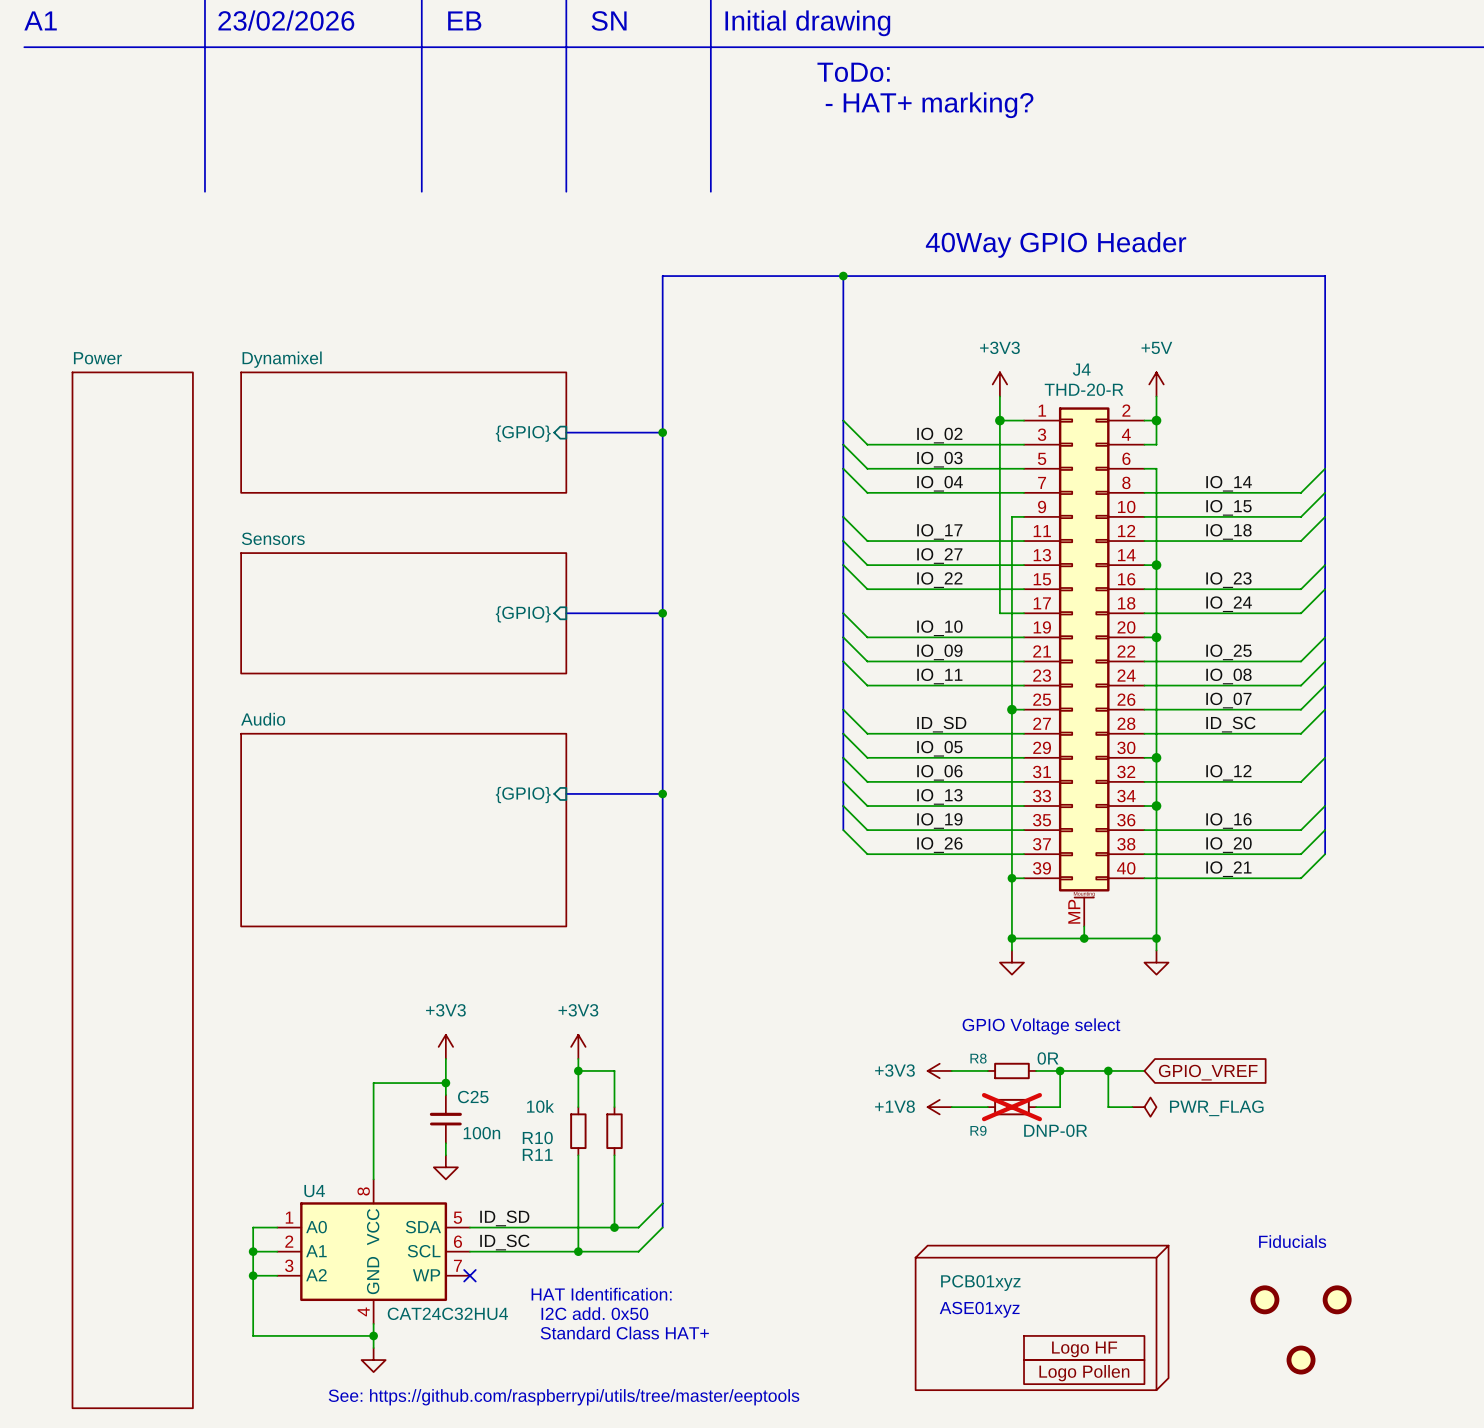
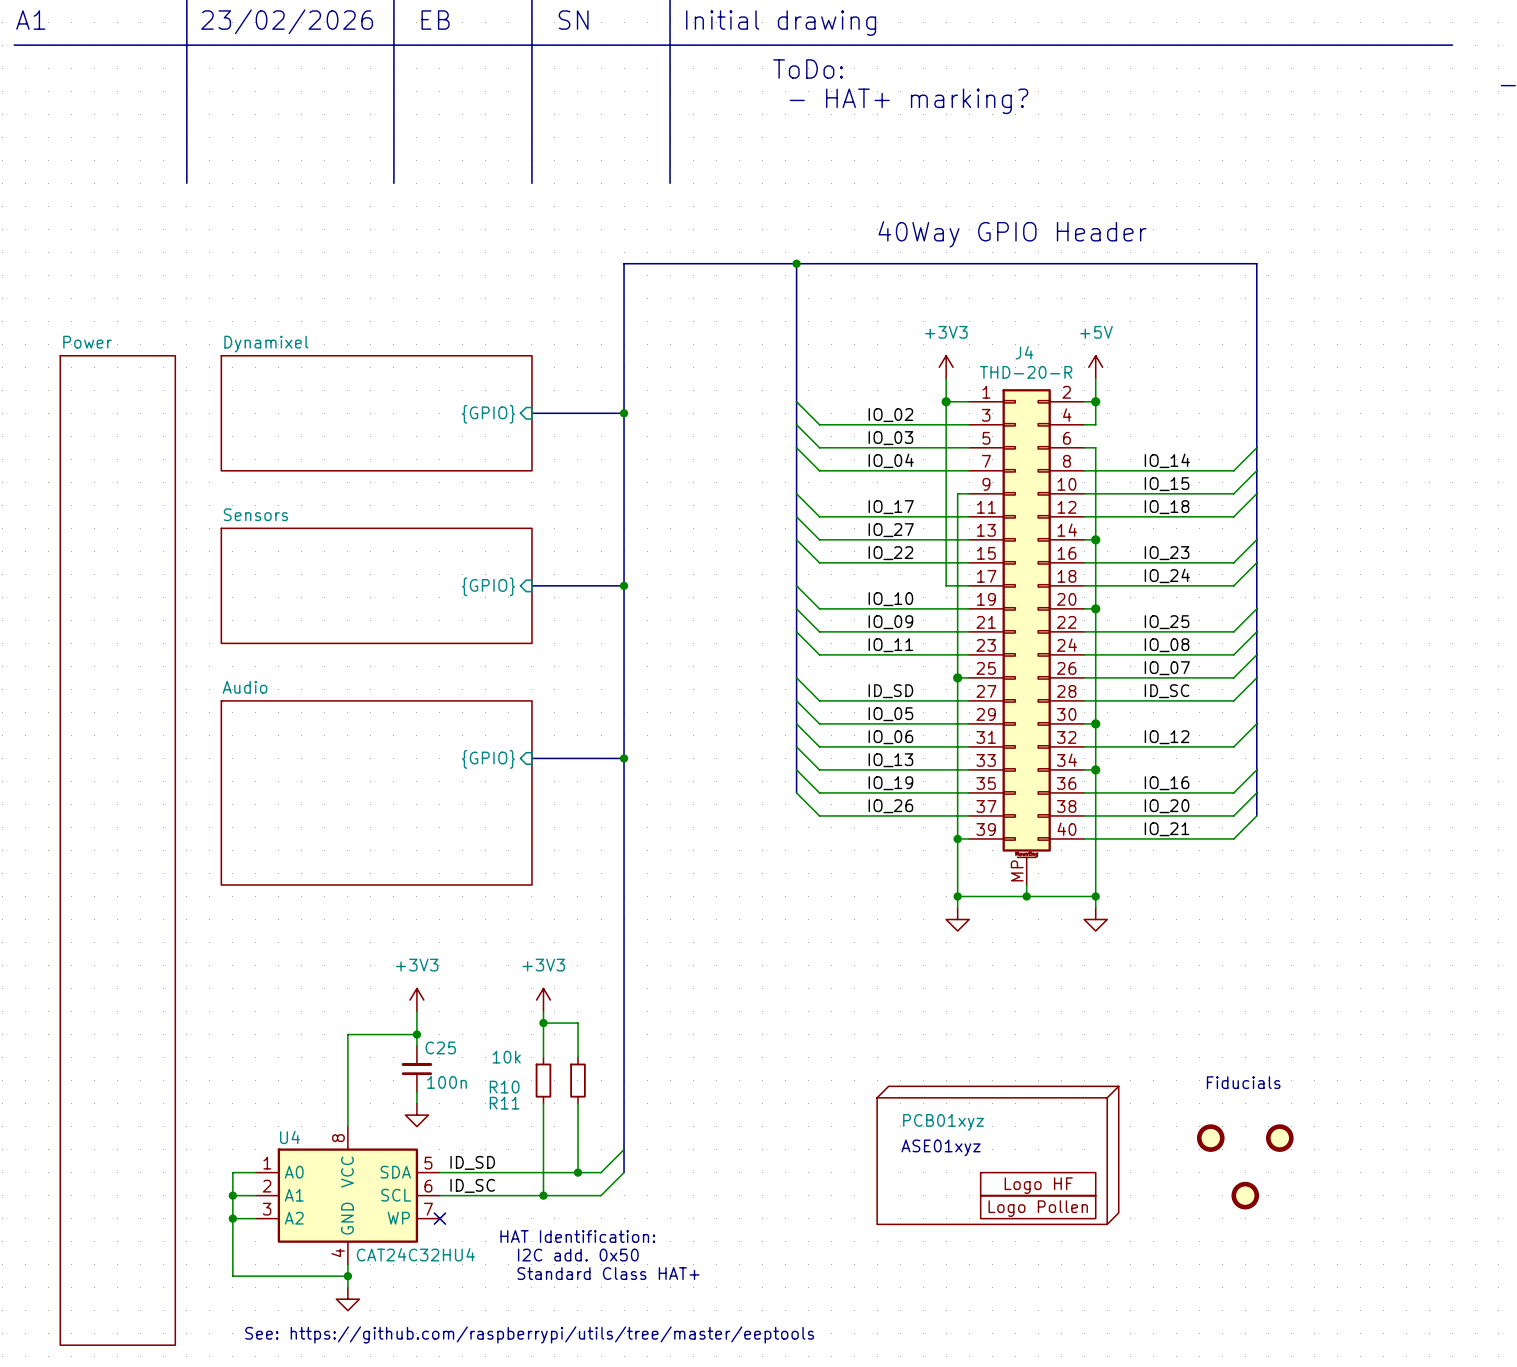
text: GPIO Voltage select (1041, 1026) -> none
power symbol: +3V3 (939, 1070) -> none
wire: (951, 1070) (987, 1070) -> none
R8: 0R (1011, 1070) -> none
wire: (1036, 1070) (1144, 1070) -> none
wire: (1060, 1070) (1060, 1107) (1036, 1107) -> none
junction: (1060, 1070) -> none
wire: (1108, 1070) (1108, 1107) (1132, 1107) -> none
junction: (1108, 1070) -> none
global label: GPIO_VREF (1208, 1072) -> none
power symbol: +1V8 (939, 1107) -> none
wire: (951, 1107) (987, 1107) -> none
R9: DNP-0R (1011, 1107) -> none
power symbol: PWR_FLAG (1144, 1107) -> none
part: none -> (1210, 1138)
part: none -> (1279, 1138)
text position: Fiducials (1292, 1241) -> Fiducials (1243, 1082)
part: none -> (1245, 1195)
part: (1264, 1299) -> none
part: (1337, 1299) -> none
text position: ASE01xyz (979, 1309) -> ASE01xyz (941, 1147)
part position: (1042, 1317) -> (997, 1155)
part position: (1084, 1348) -> (1038, 1184)
part: (1301, 1360) -> none
part position: (1084, 1372) -> (1038, 1207)

